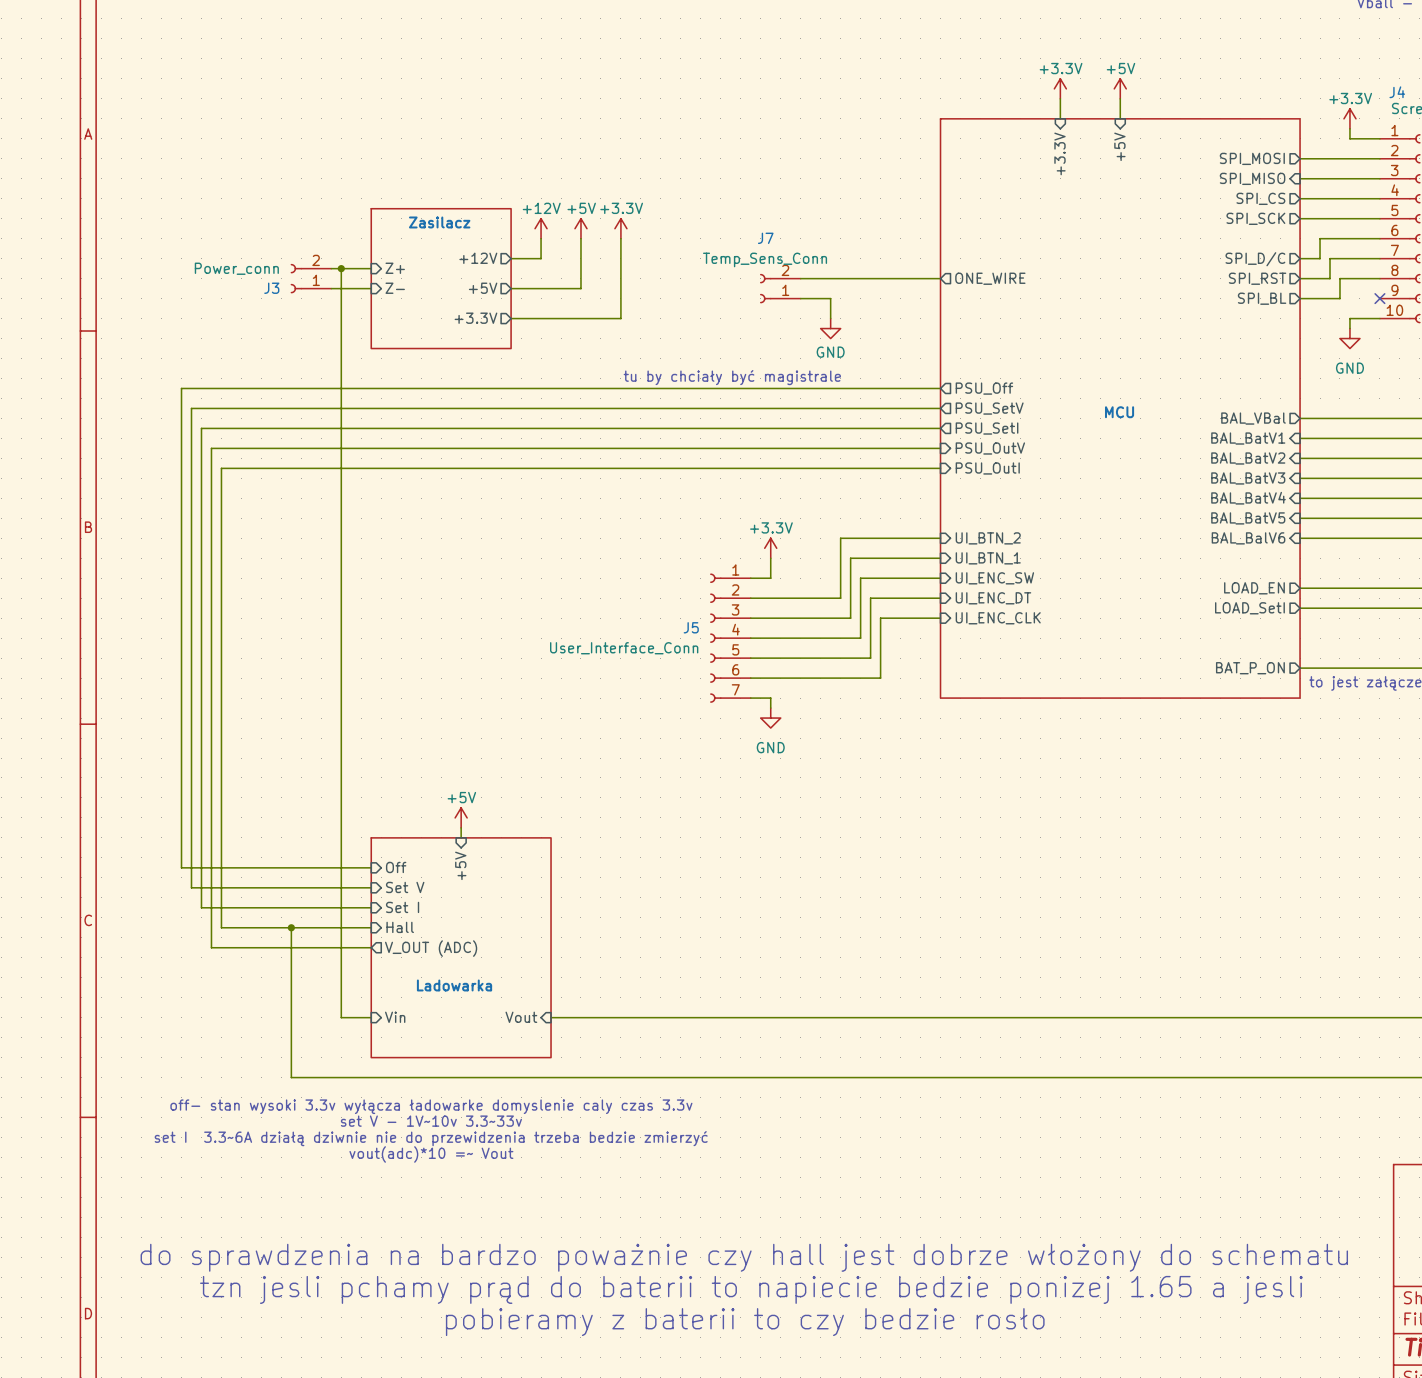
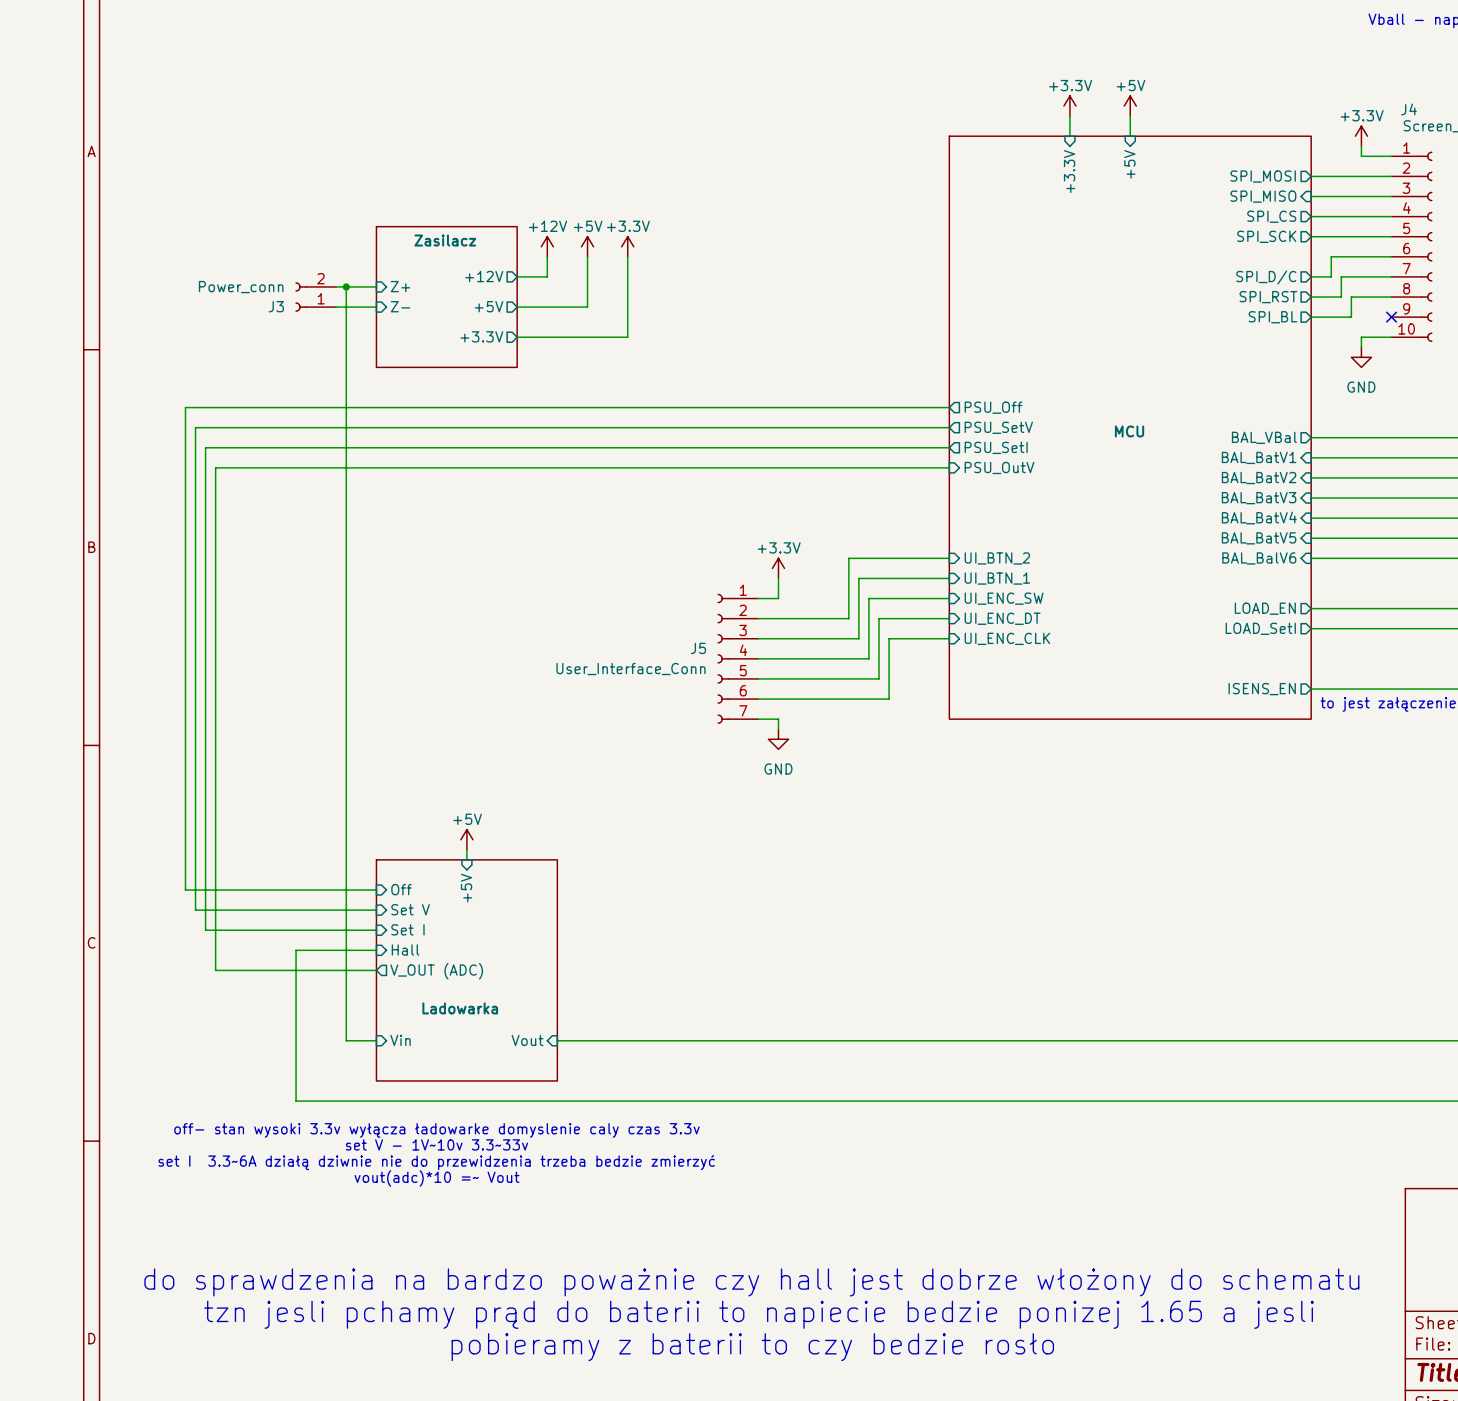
wire: (800, 278) (940, 278) -> none
sheet pin: ONE_WIRE (990, 278) -> none
J7: Temp_Sens_Conn (780, 288) -> none
wire: (800, 298) (830, 298) (830, 318) -> none
power symbol: GND (830, 328) -> none
text: tu by chciały być magistrale (732, 377) -> none
wire: (940, 468) (221, 468) (221, 927) (291, 927) -> none
sheet pin: PSU_OutI (987, 468) -> none
sheet pin: BAT_P_ON (1250, 668) -> ISENS_EN (1262, 689)
junction: (291, 927) -> none

